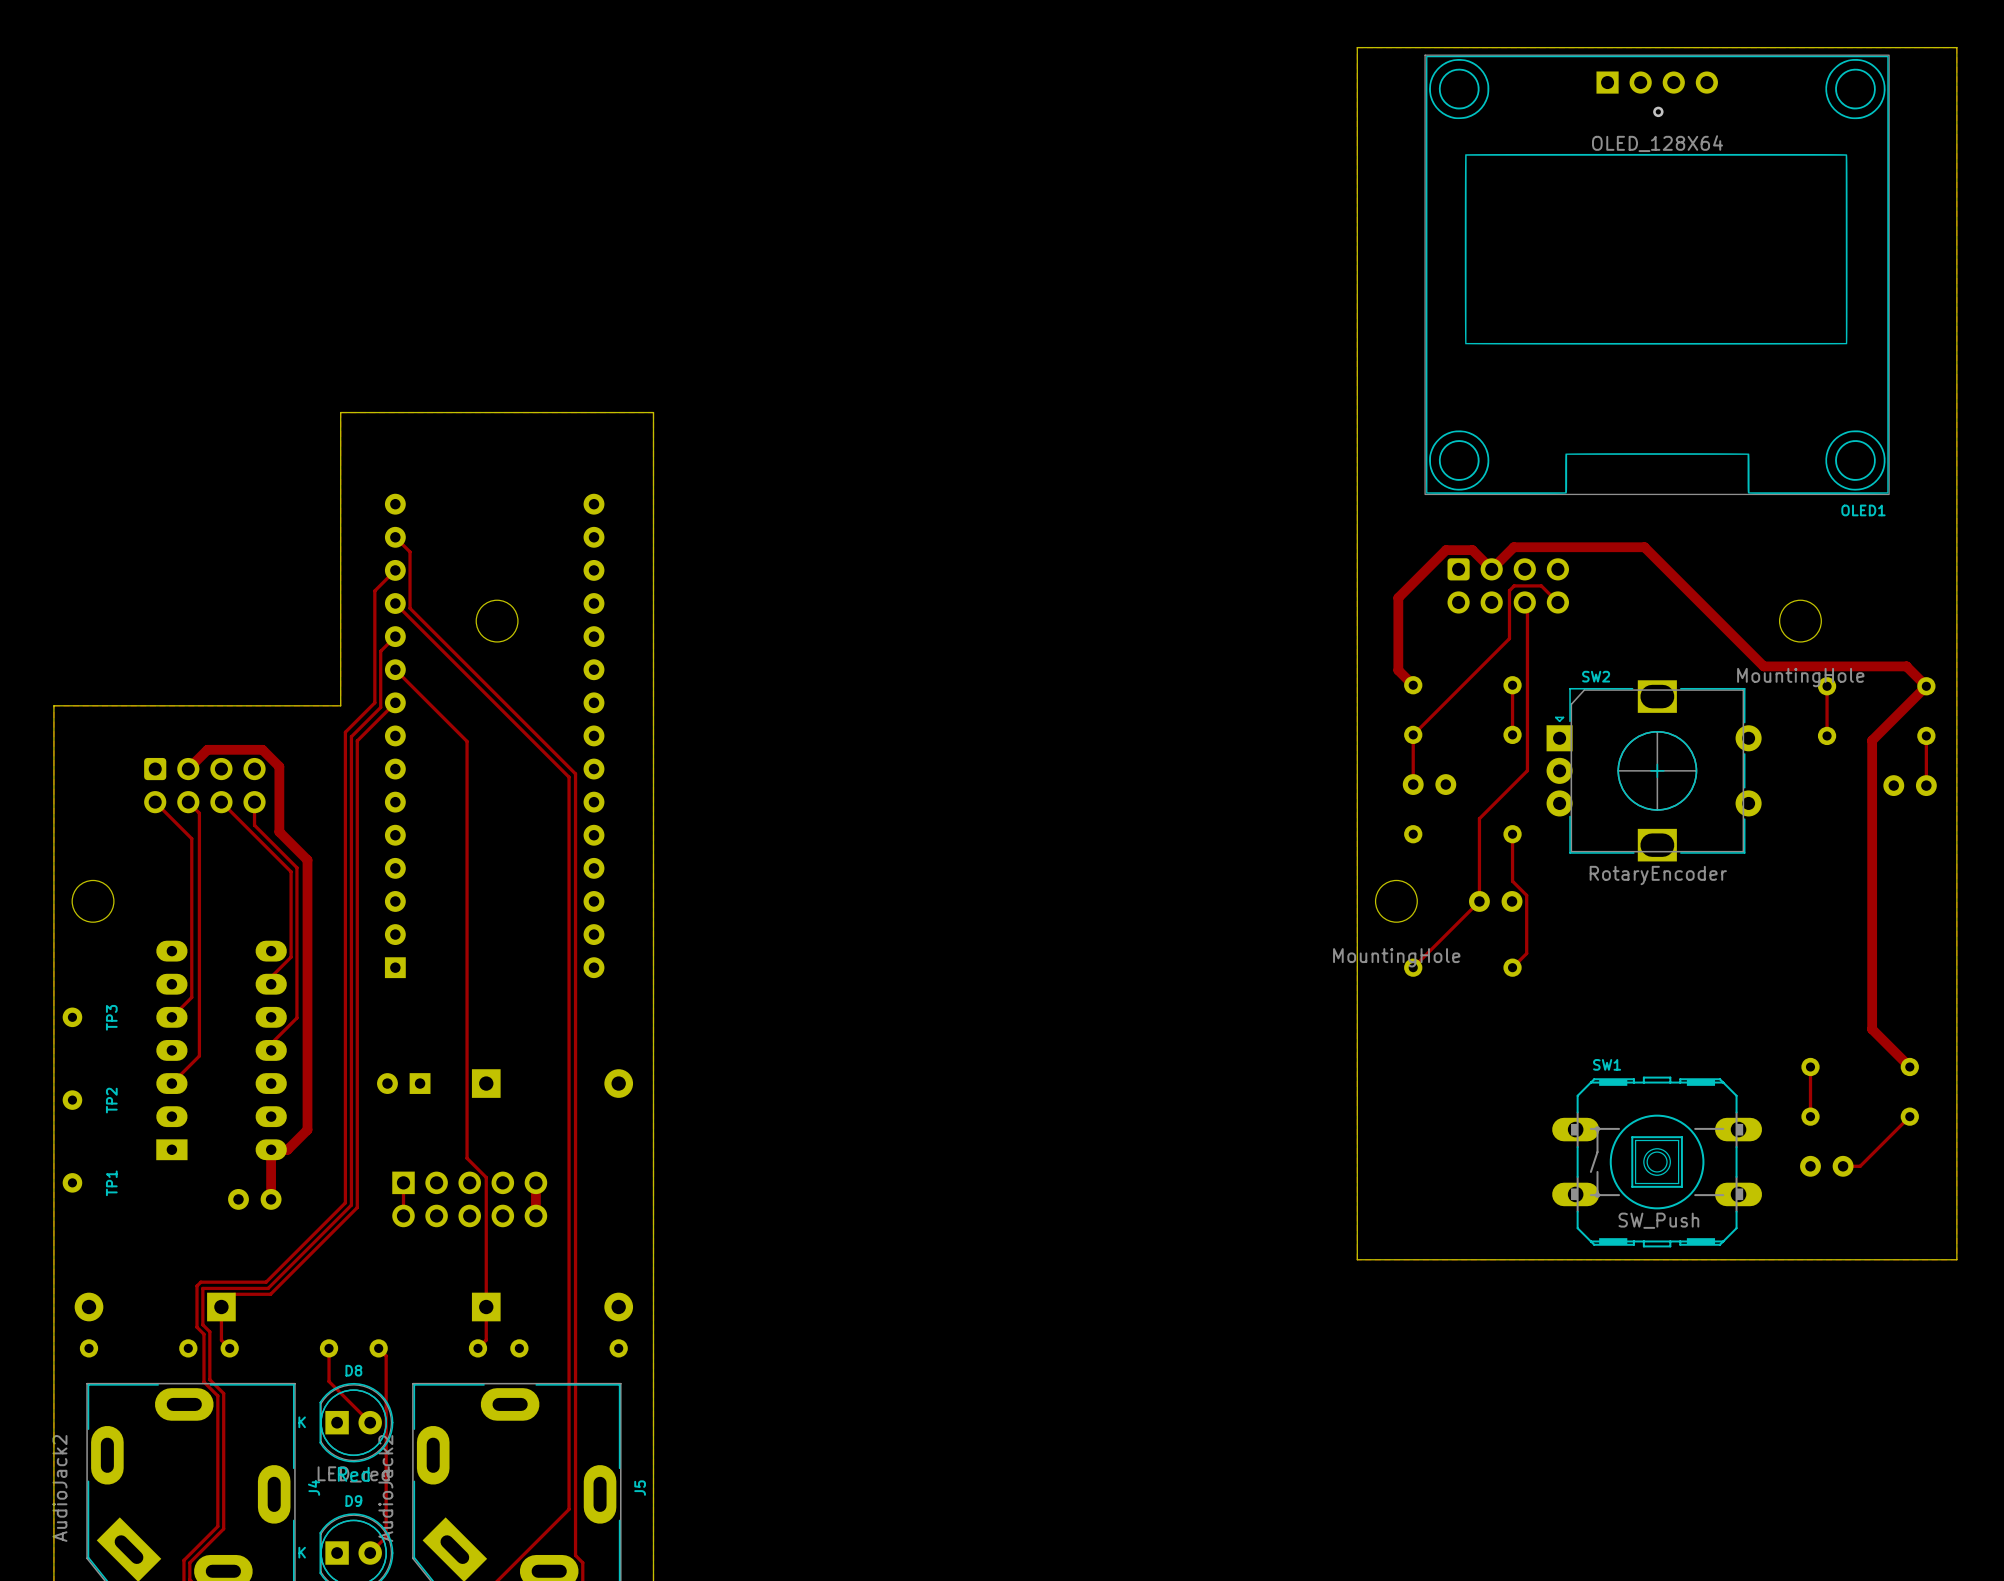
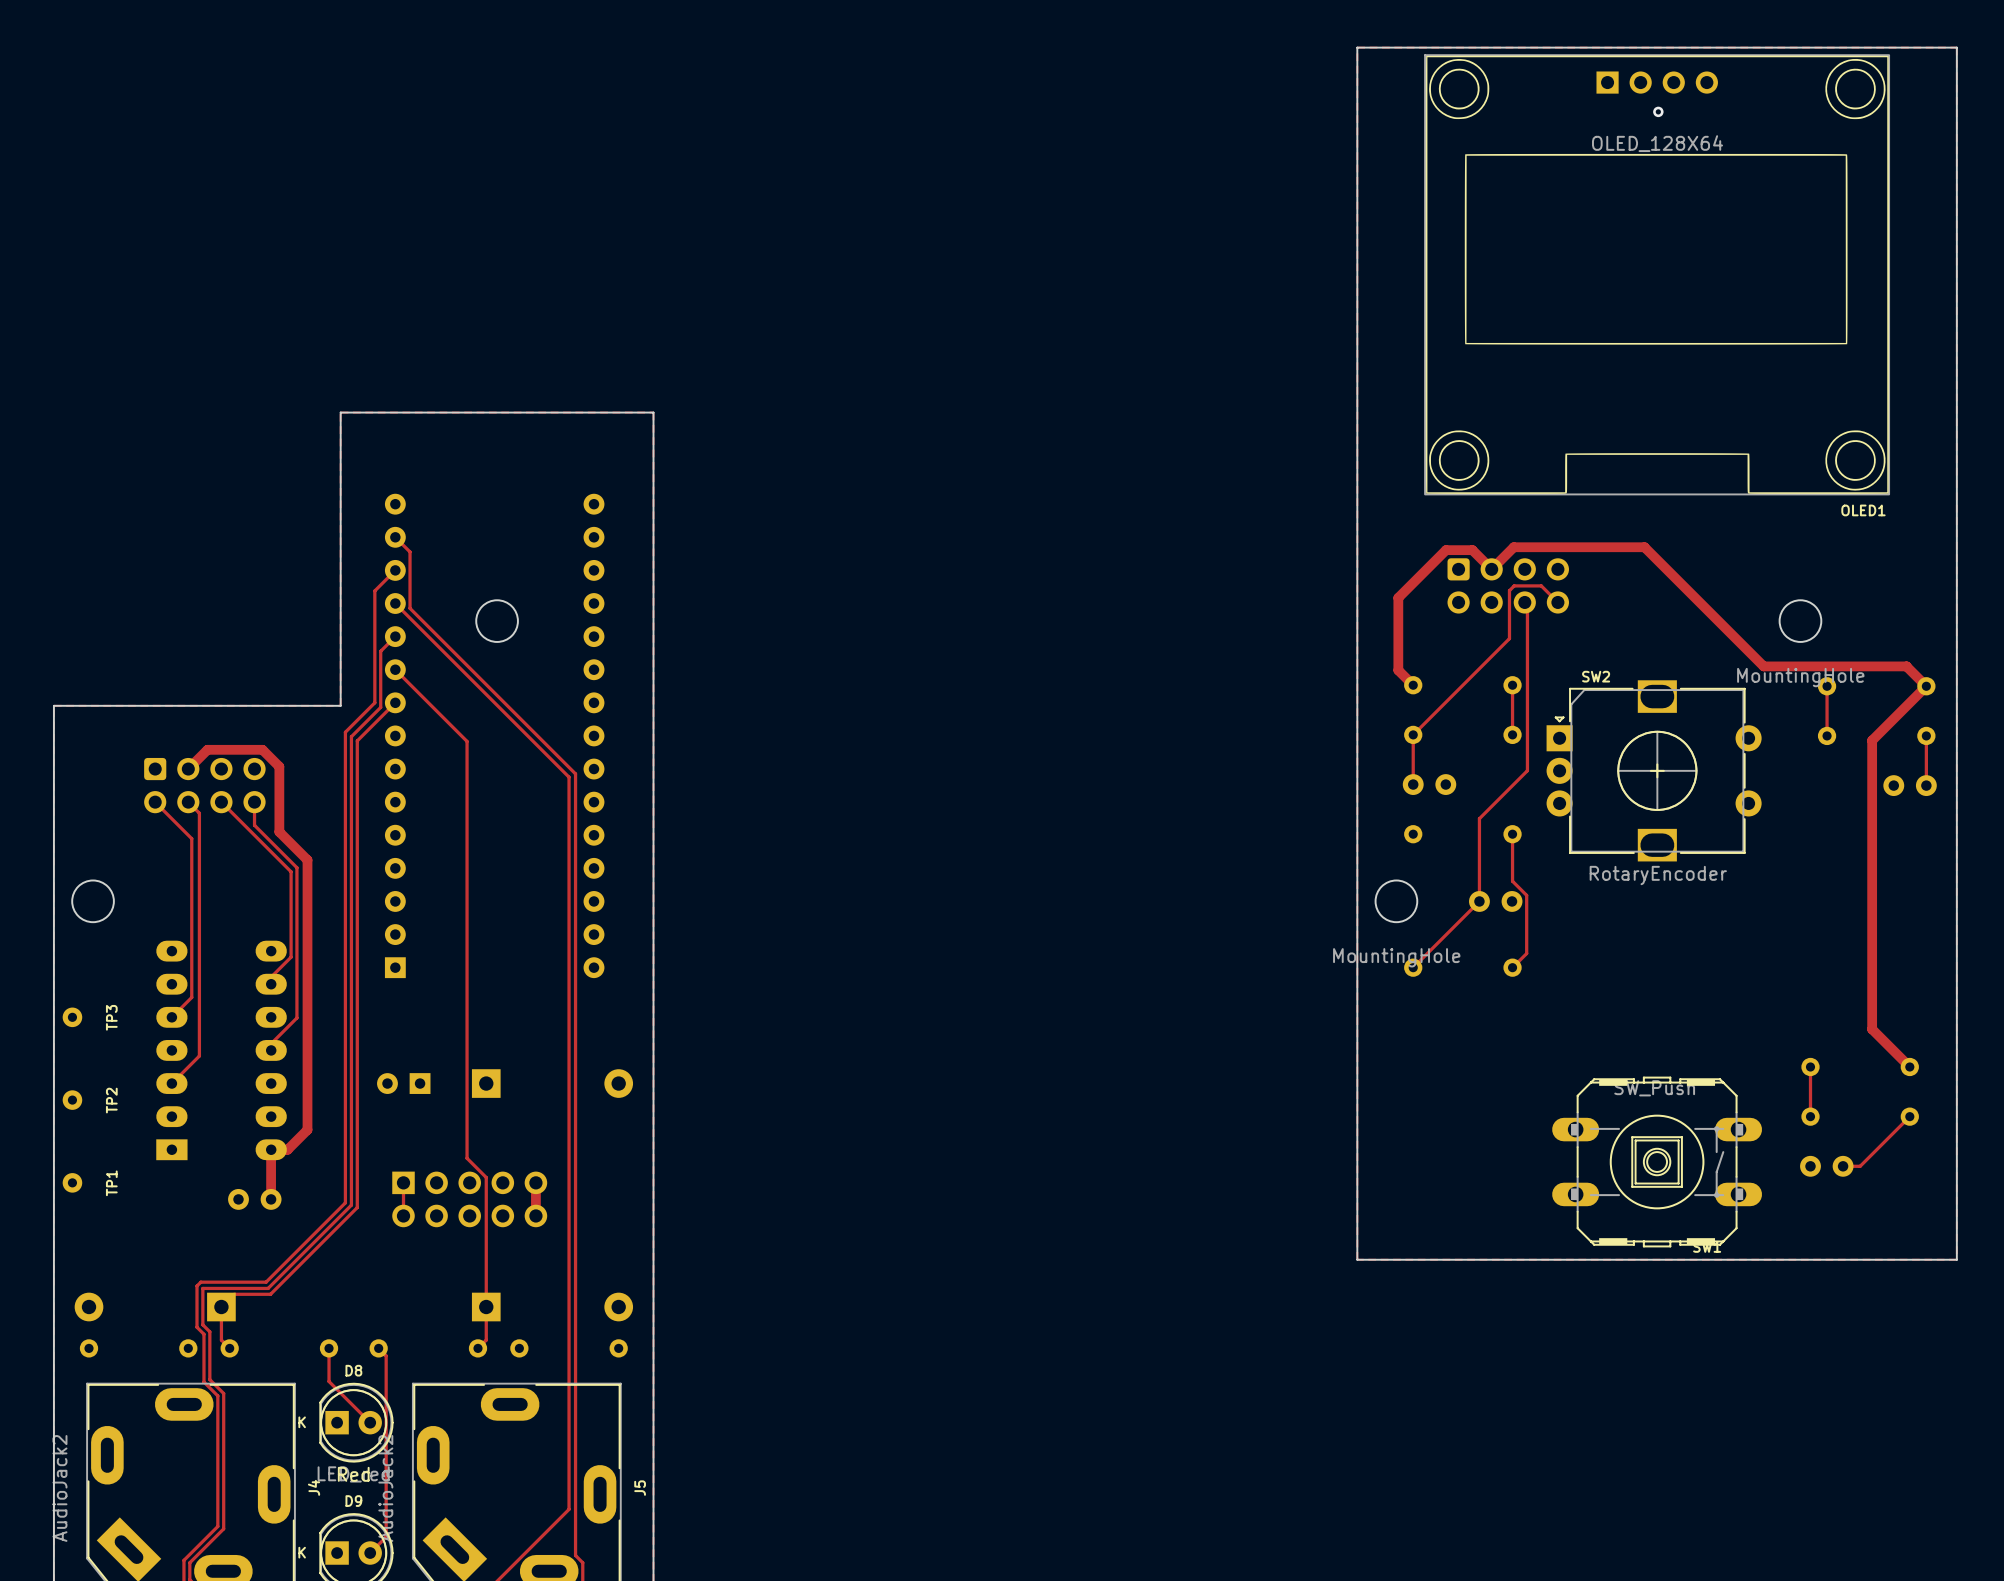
SW1 rotation: 0° (1657, 1162) -> 180° (1657, 1162)

